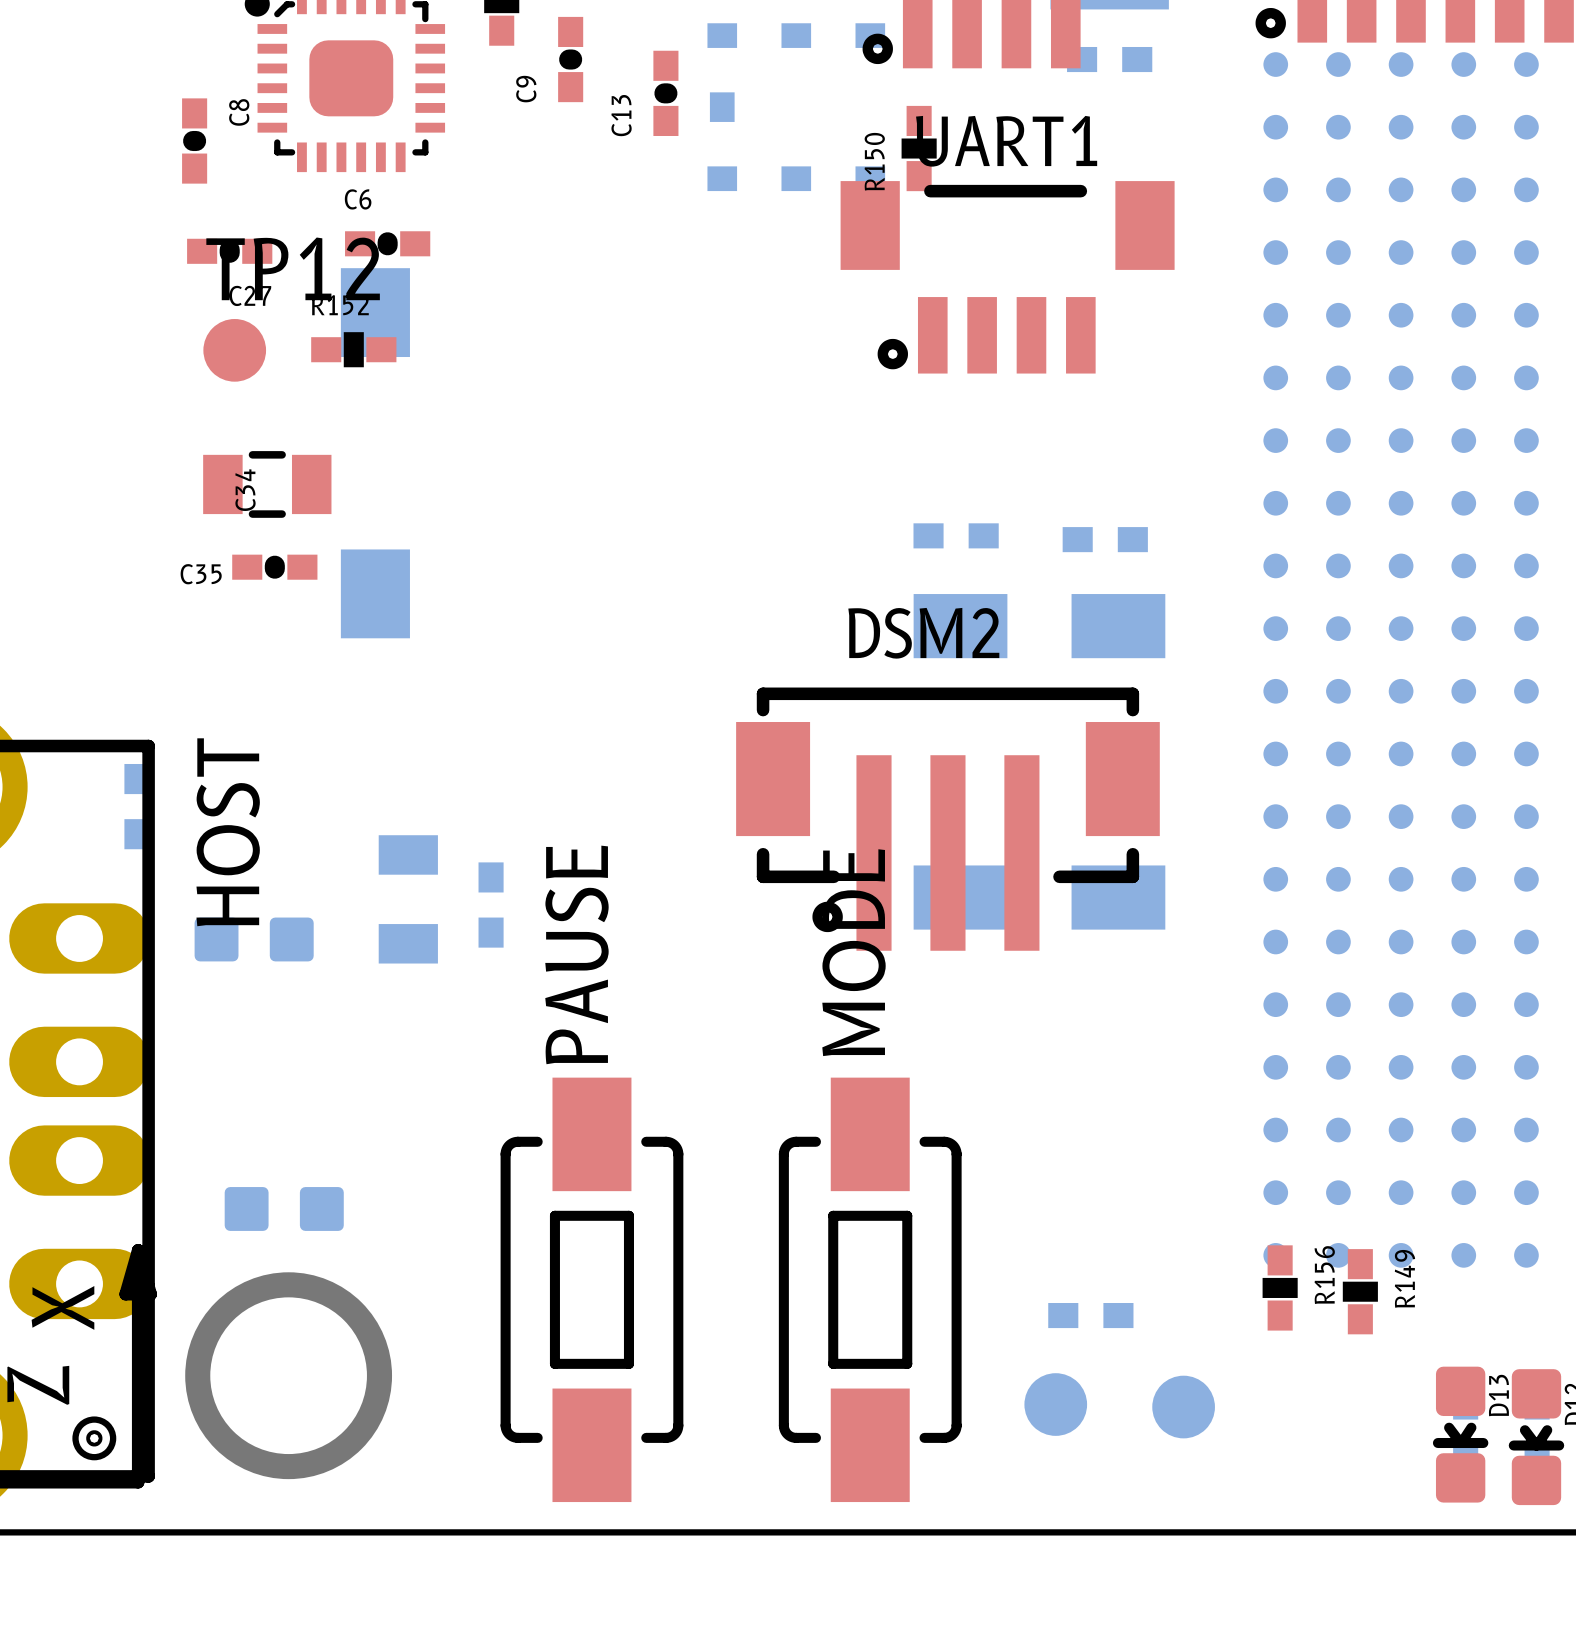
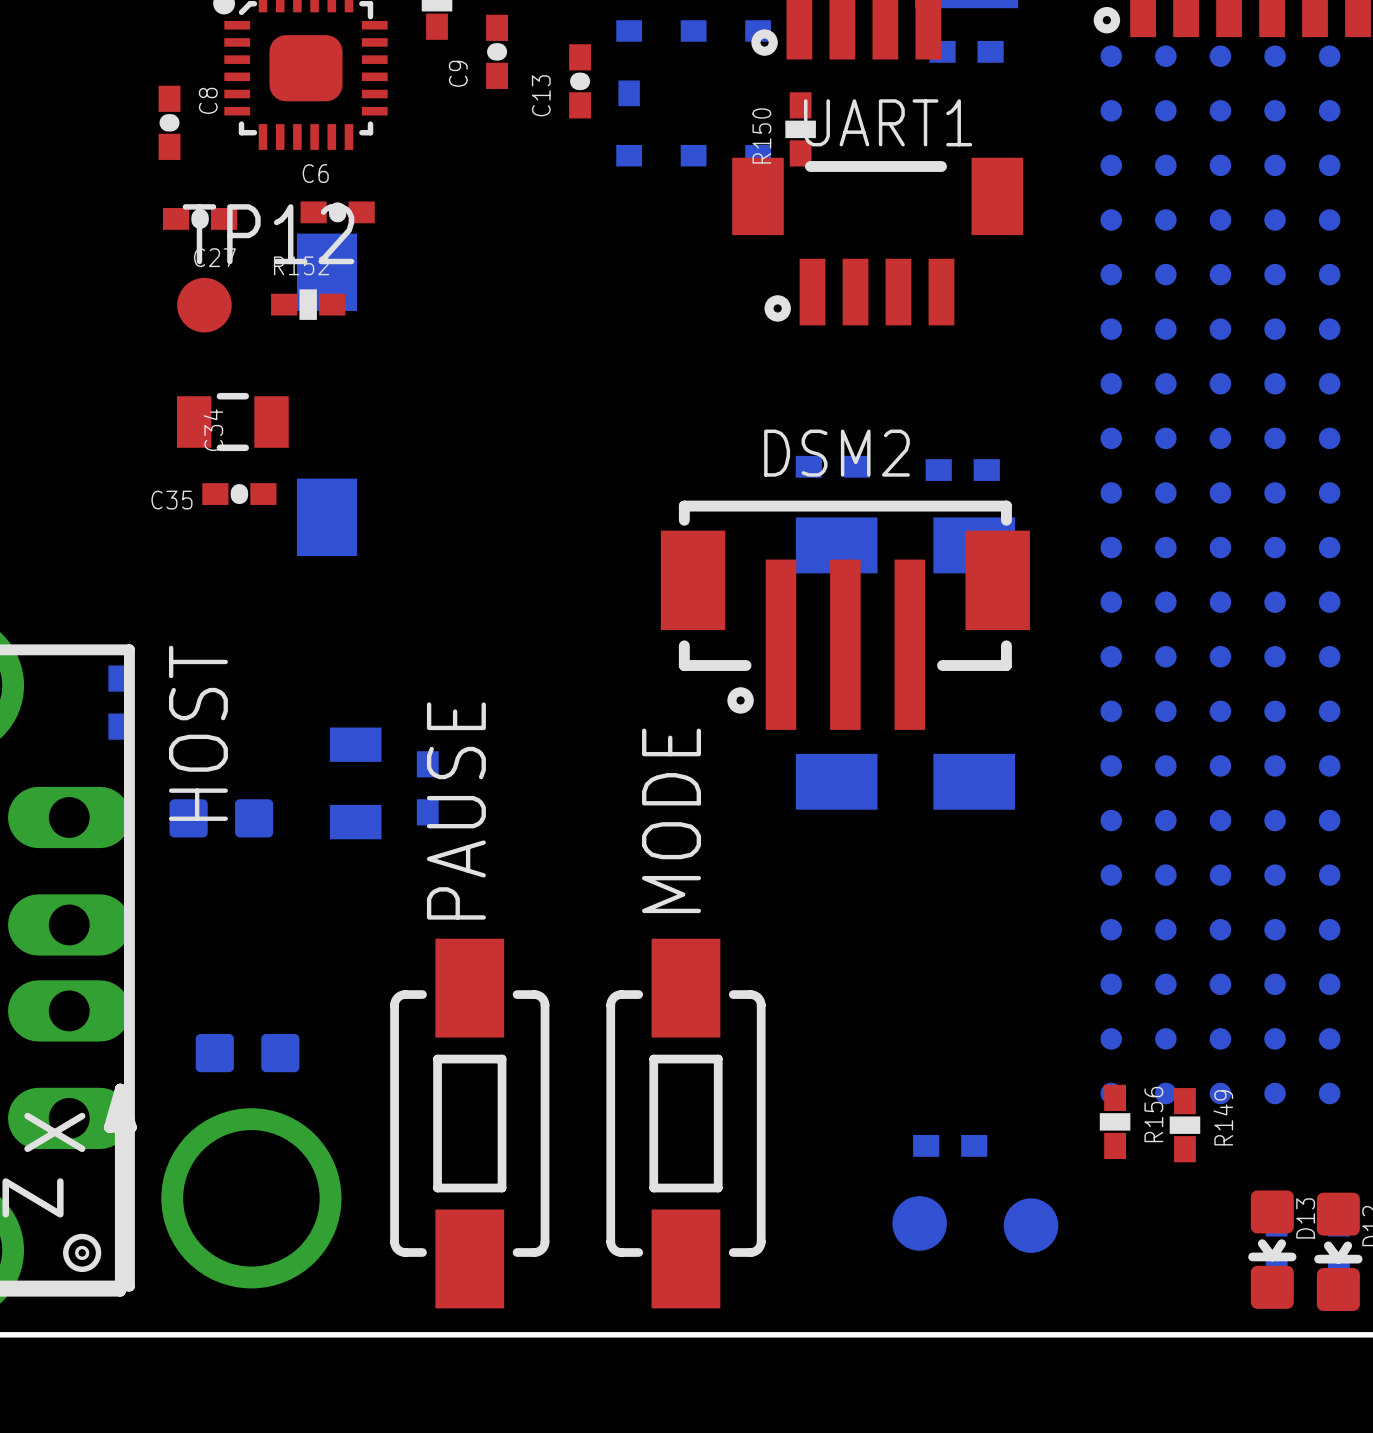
DSM2 position: (947, 819) -> (845, 615)
PAUSE position: (591, 1289) -> (469, 1123)
MODE position: (870, 1289) -> (685, 1123)

